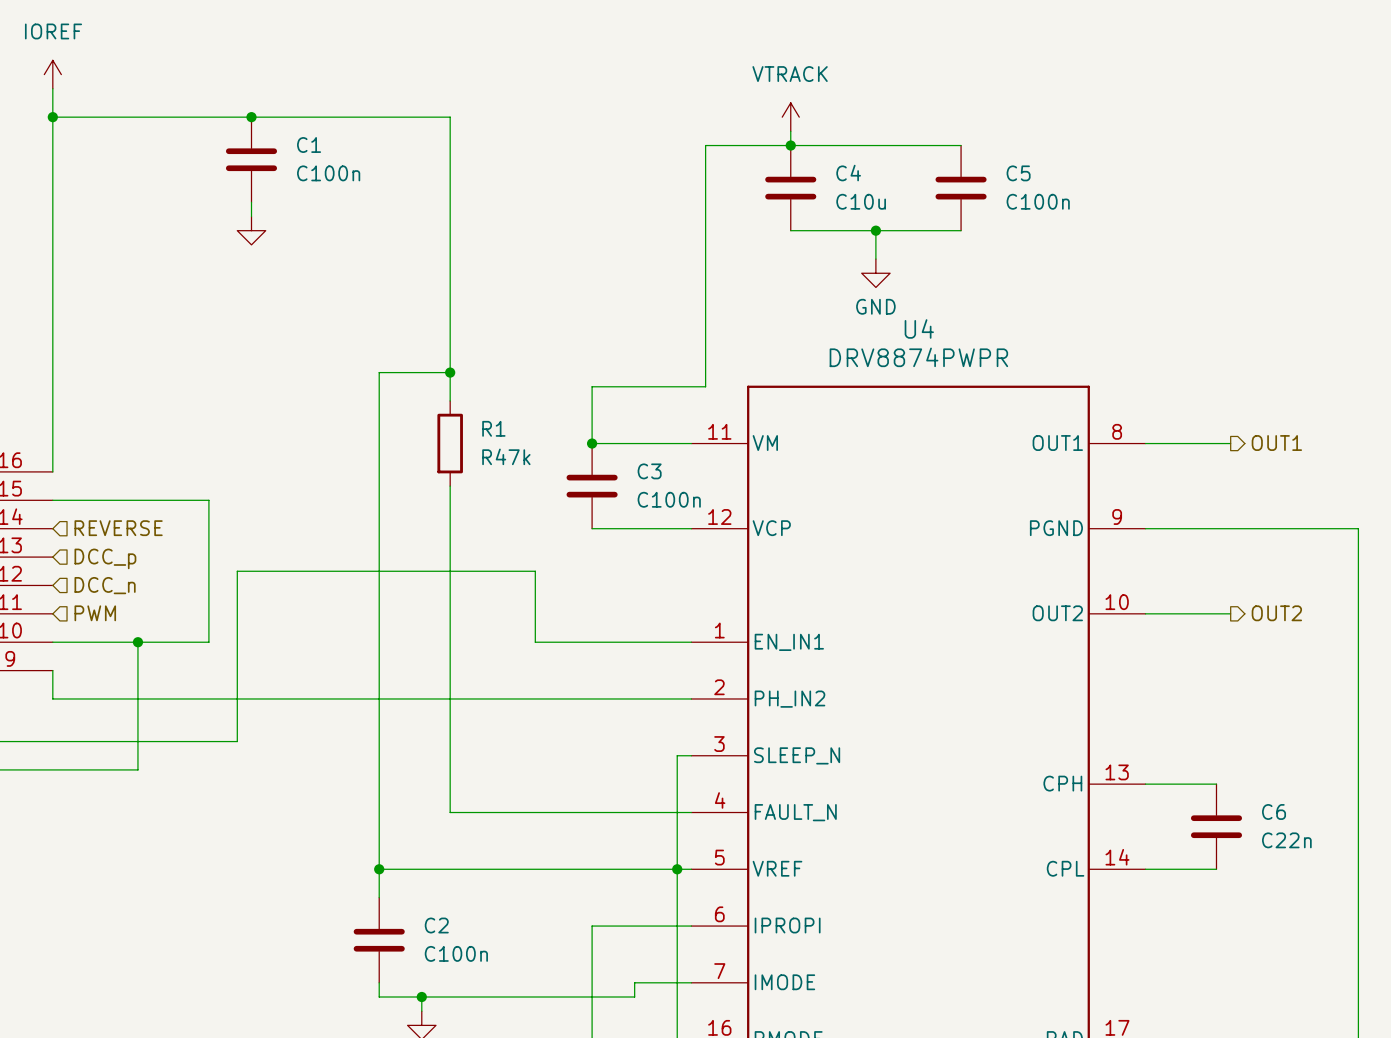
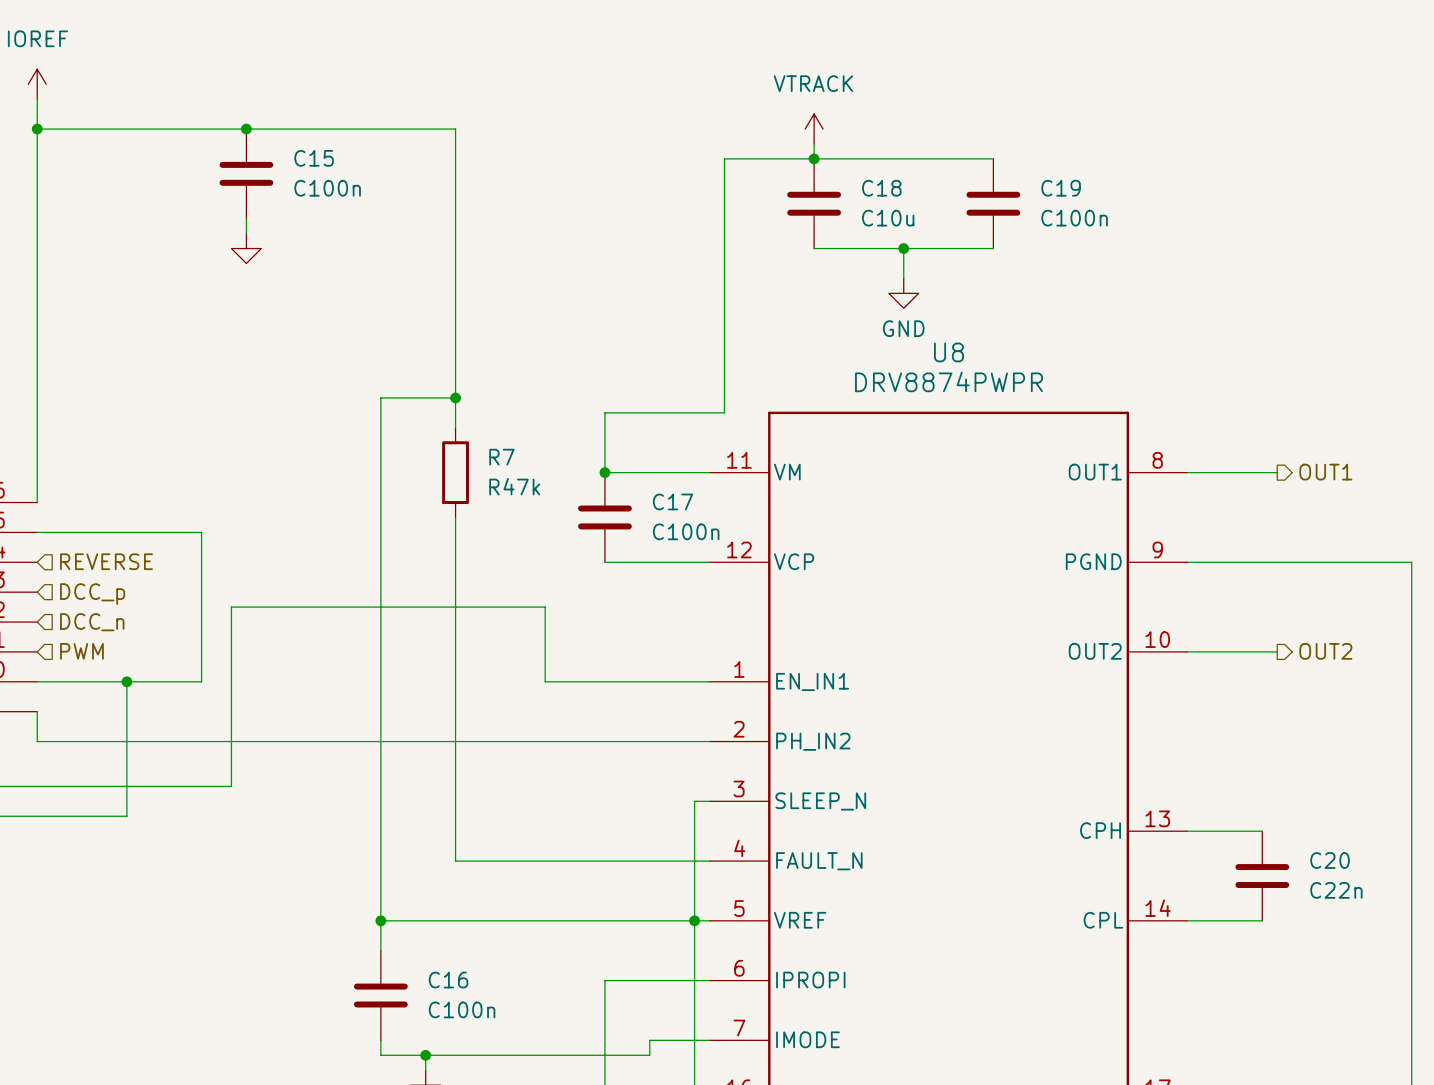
C1 name: C1 (309, 145) -> C15 (314, 158)
C4 name: C4 (848, 173) -> C18 (881, 188)
C5 name: C5 (1018, 173) -> C19 (1061, 188)
U4 name: U4 (919, 328) -> U8 (948, 352)
R1 name: R1 (493, 428) -> R7 (501, 457)
C3 name: C3 (649, 471) -> C17 (673, 501)
C6 name: C6 (1274, 811) -> C20 (1329, 860)
C2 name: C2 (436, 925) -> C16 (448, 980)

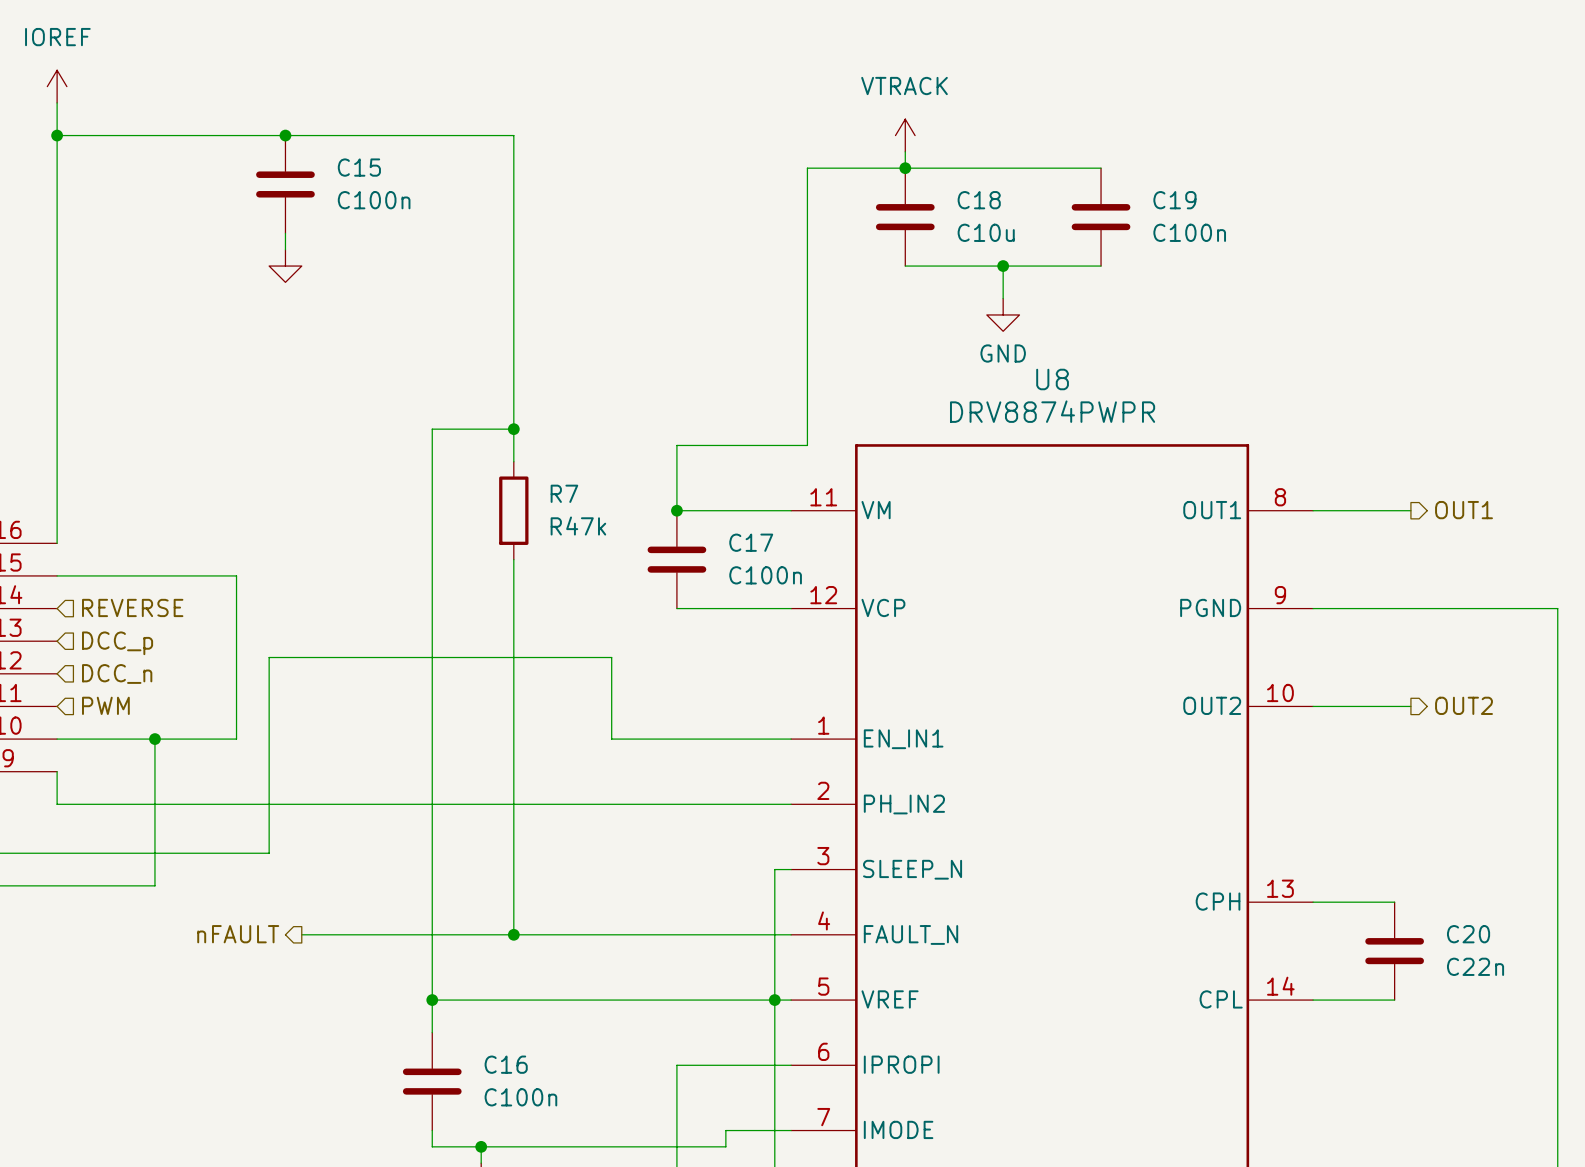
hierarchical label: none -> nFAULT (238, 934)
wire: none -> (301, 934) (513, 934)
junction: none -> (513, 934)

